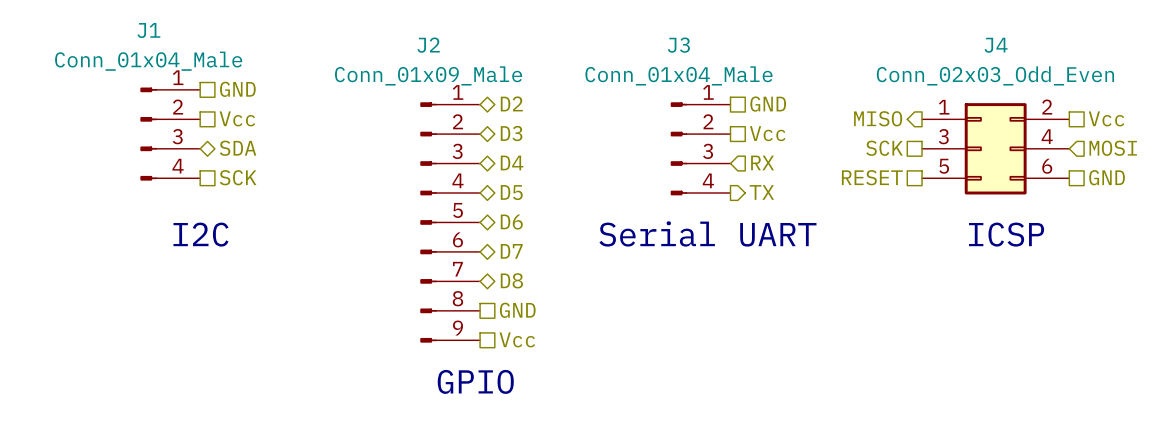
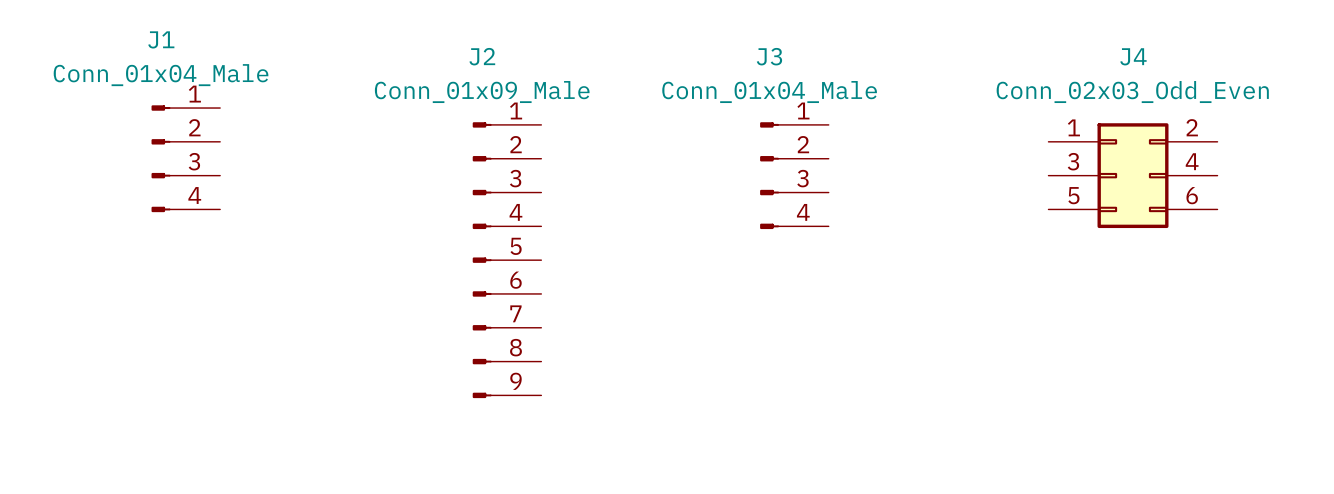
hierarchical label: GND (237, 89) -> none
hierarchical label: D2 (511, 103) -> none
hierarchical label: GND (768, 104) -> none
hierarchical label: Vcc (237, 118) -> none
hierarchical label: MISO (878, 118) -> none
hierarchical label: Vcc (1106, 118) -> none
hierarchical label: D3 (511, 133) -> none
hierarchical label: Vcc (767, 133) -> none
hierarchical label: SDA (238, 148) -> none
hierarchical label: SCK (884, 148) -> none
hierarchical label: MOSI (1113, 148) -> none
hierarchical label: D4 (512, 162) -> none
hierarchical label: RX (762, 162) -> none
hierarchical label: SCK (238, 177) -> none
hierarchical label: RESET (872, 177) -> none
hierarchical label: GND (1107, 177) -> none
hierarchical label: D5 (511, 192) -> none
hierarchical label: TX (761, 192) -> none
hierarchical label: D6 (511, 222) -> none
text: Serial UART (707, 233) -> none
text: I2C (200, 234) -> none
text: ICSP (1006, 234) -> none
hierarchical label: D7 (511, 251) -> none
hierarchical label: D8 (511, 280) -> none
hierarchical label: GND (517, 310) -> none
hierarchical label: Vcc (517, 339) -> none
text: GPIO (475, 381) -> none

